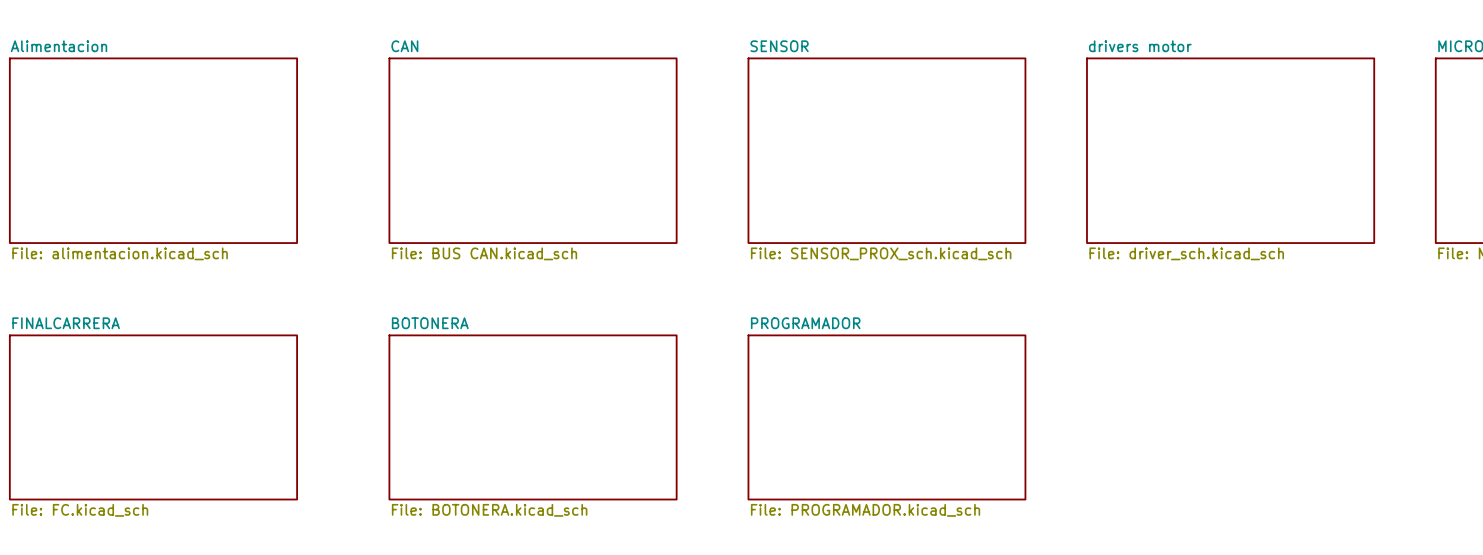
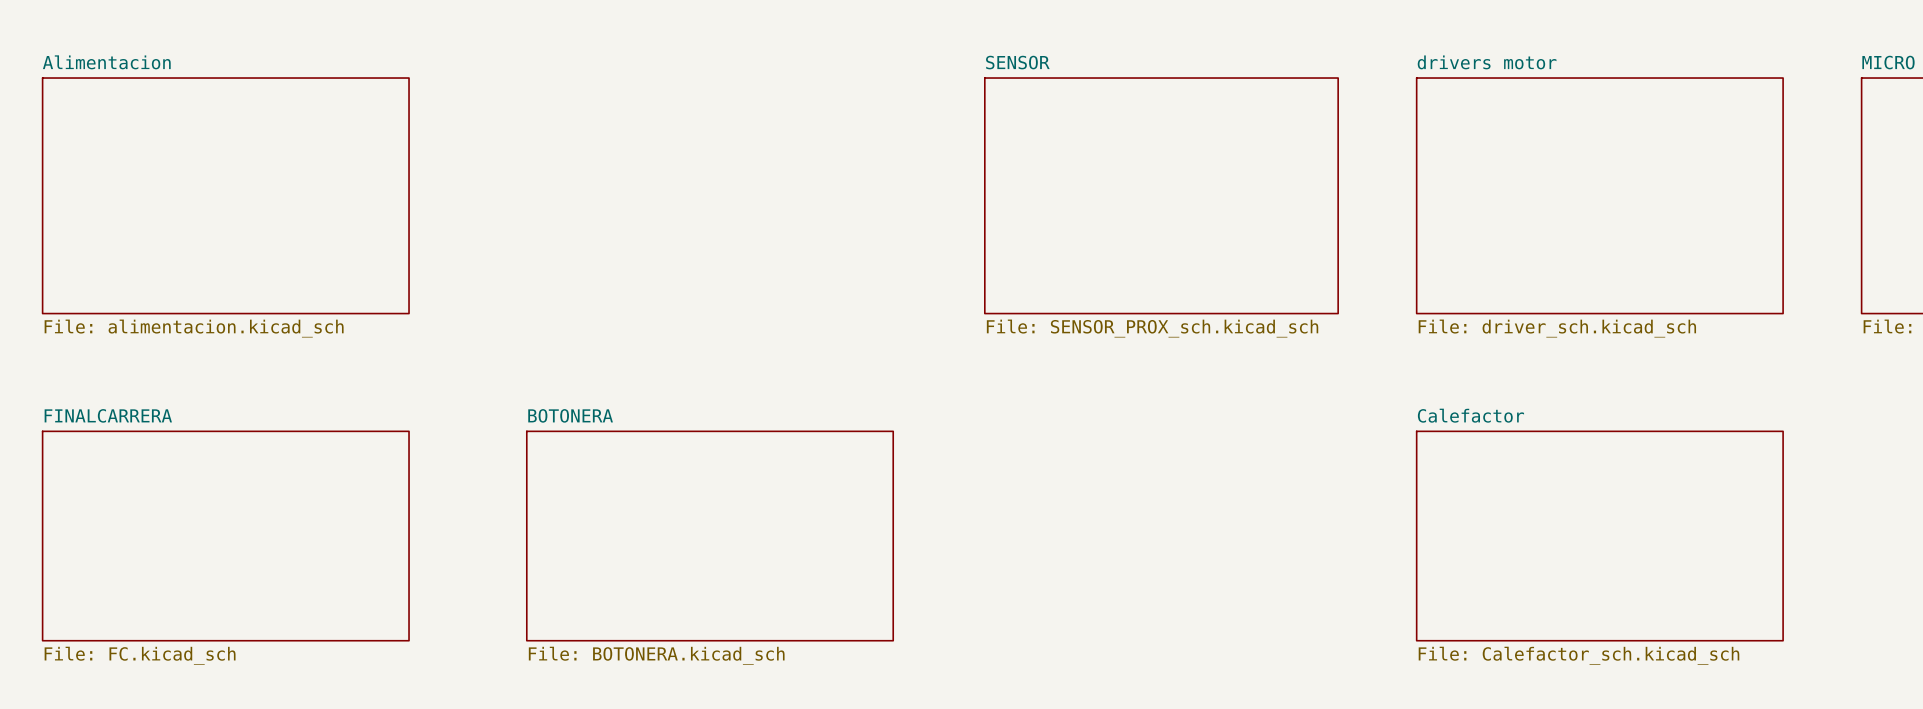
sheet CAN: File: BUS CAN.kicad_sch (533, 150) -> none
sheet PROGRAMADOR: File: PROGRAMADOR.kicad_sch (886, 417) -> none
sheet Calefactor: none -> File: Calefactor_sch.kicad_sch (1599, 536)

